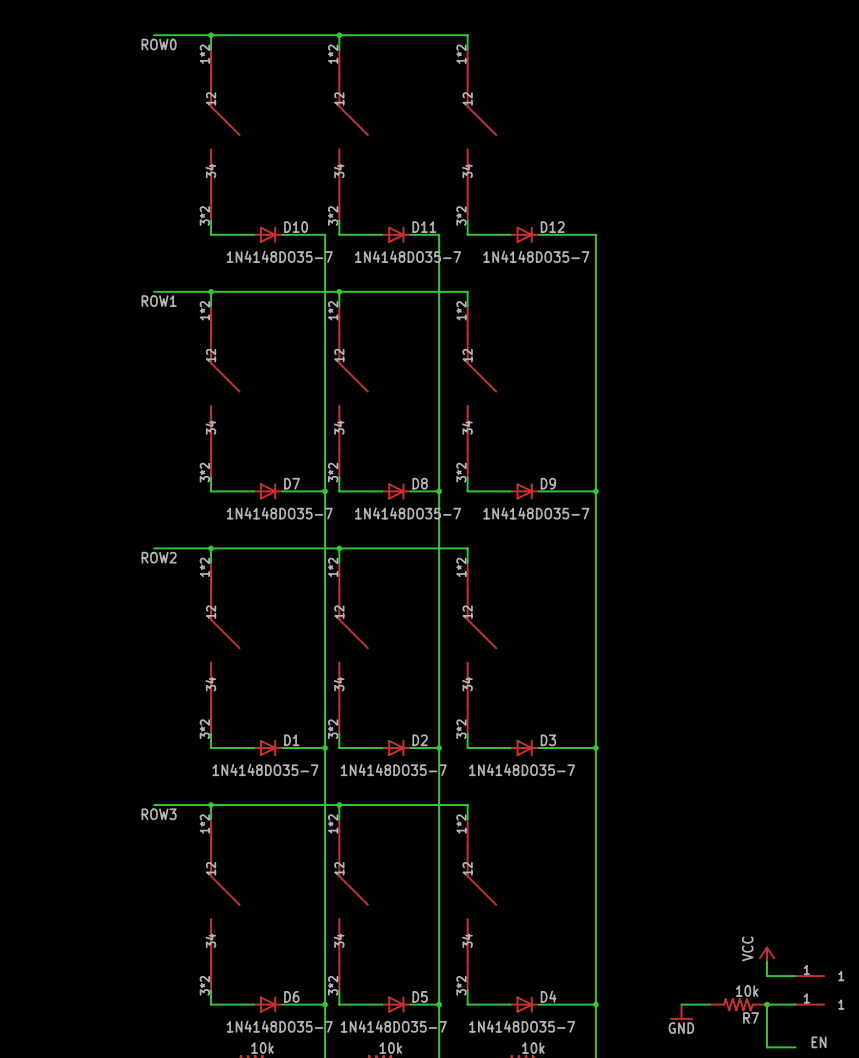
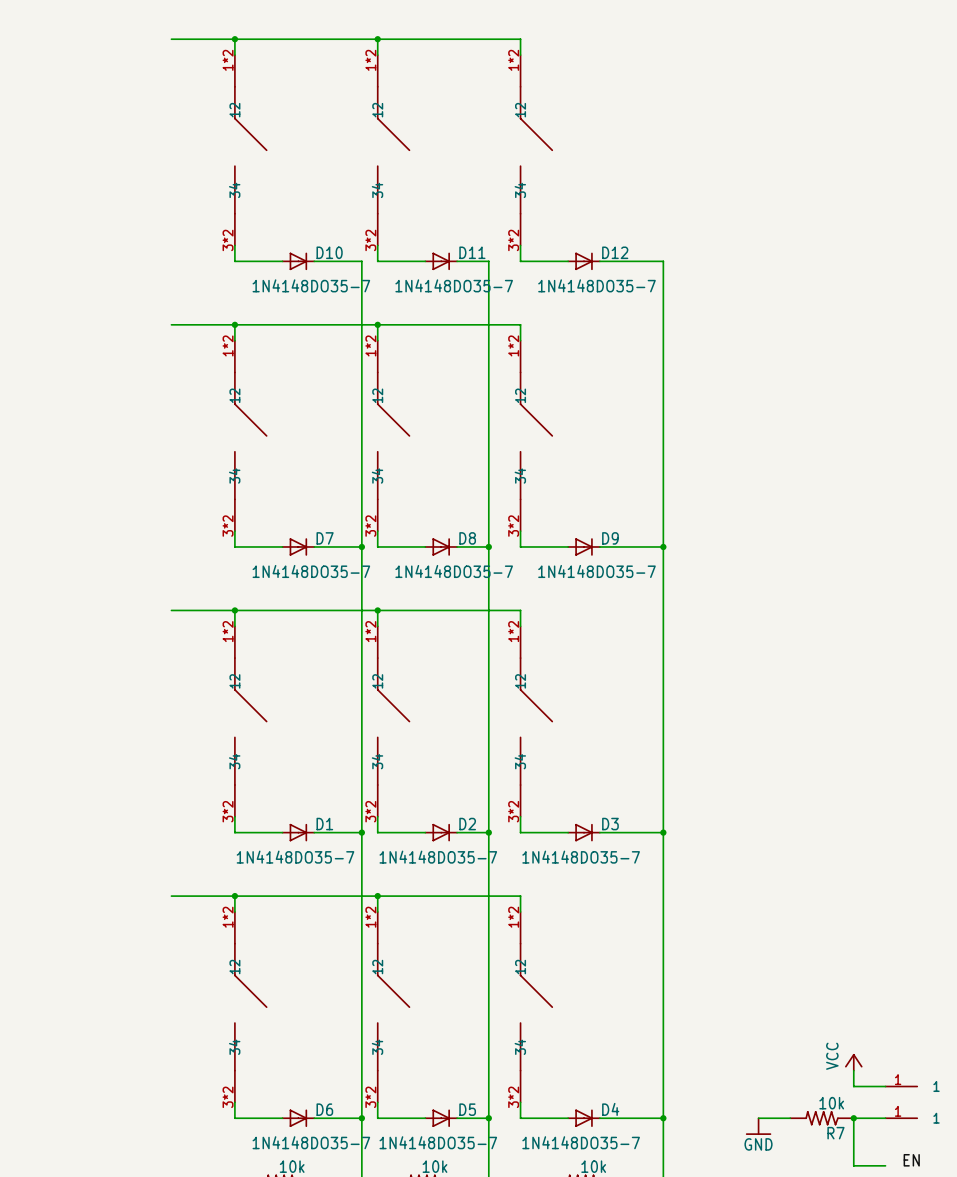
label: ROW0 (159, 44) -> none
label: ROW1 (159, 301) -> none
label: ROW2 (159, 557) -> none
label: ROW3 (159, 814) -> none

